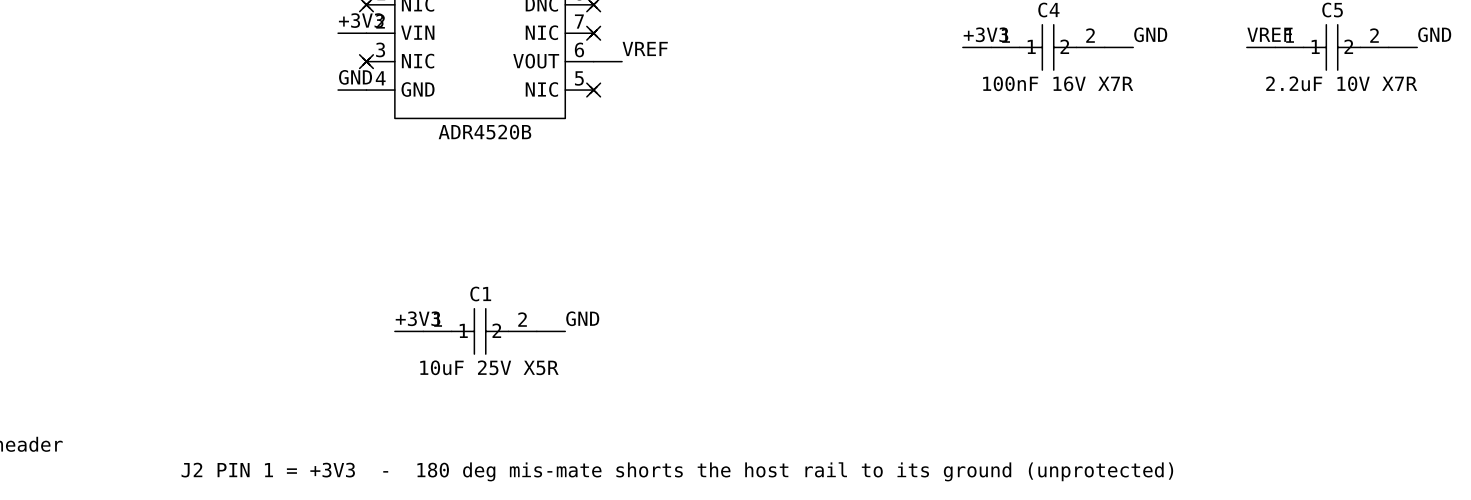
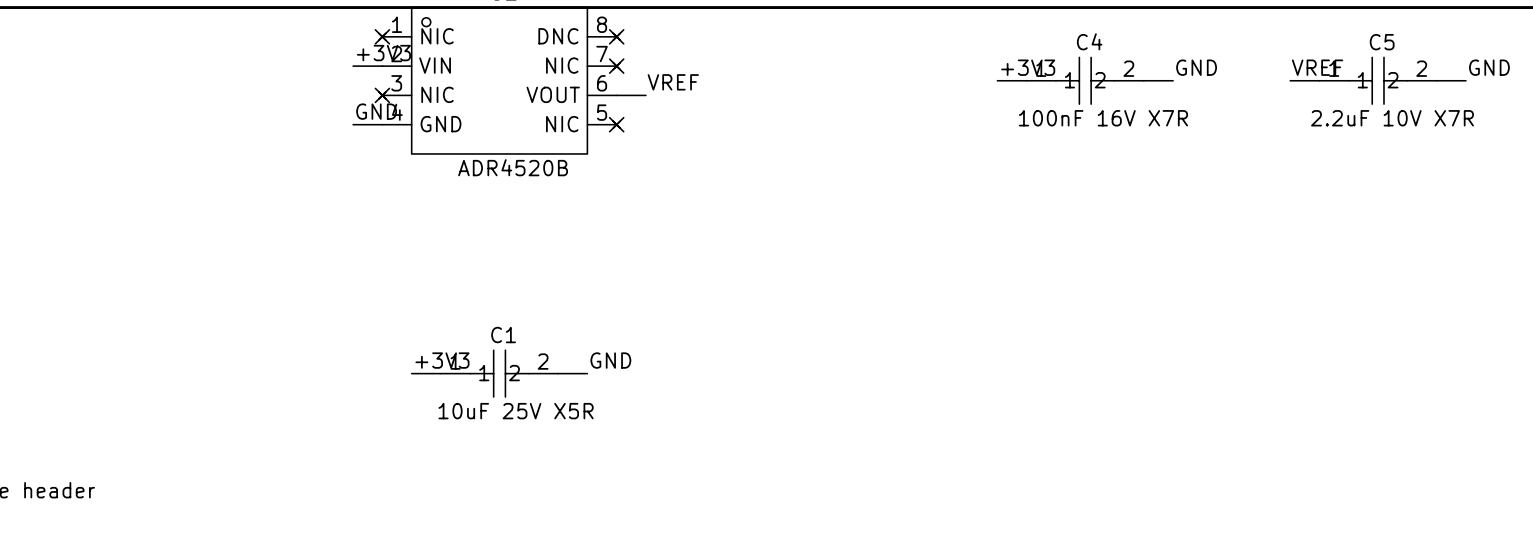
text: J2 PIN 1 = +3V3 - 180 deg mis-mate shorts the host rail to its ground (unprotected) (677, 471) -> none

